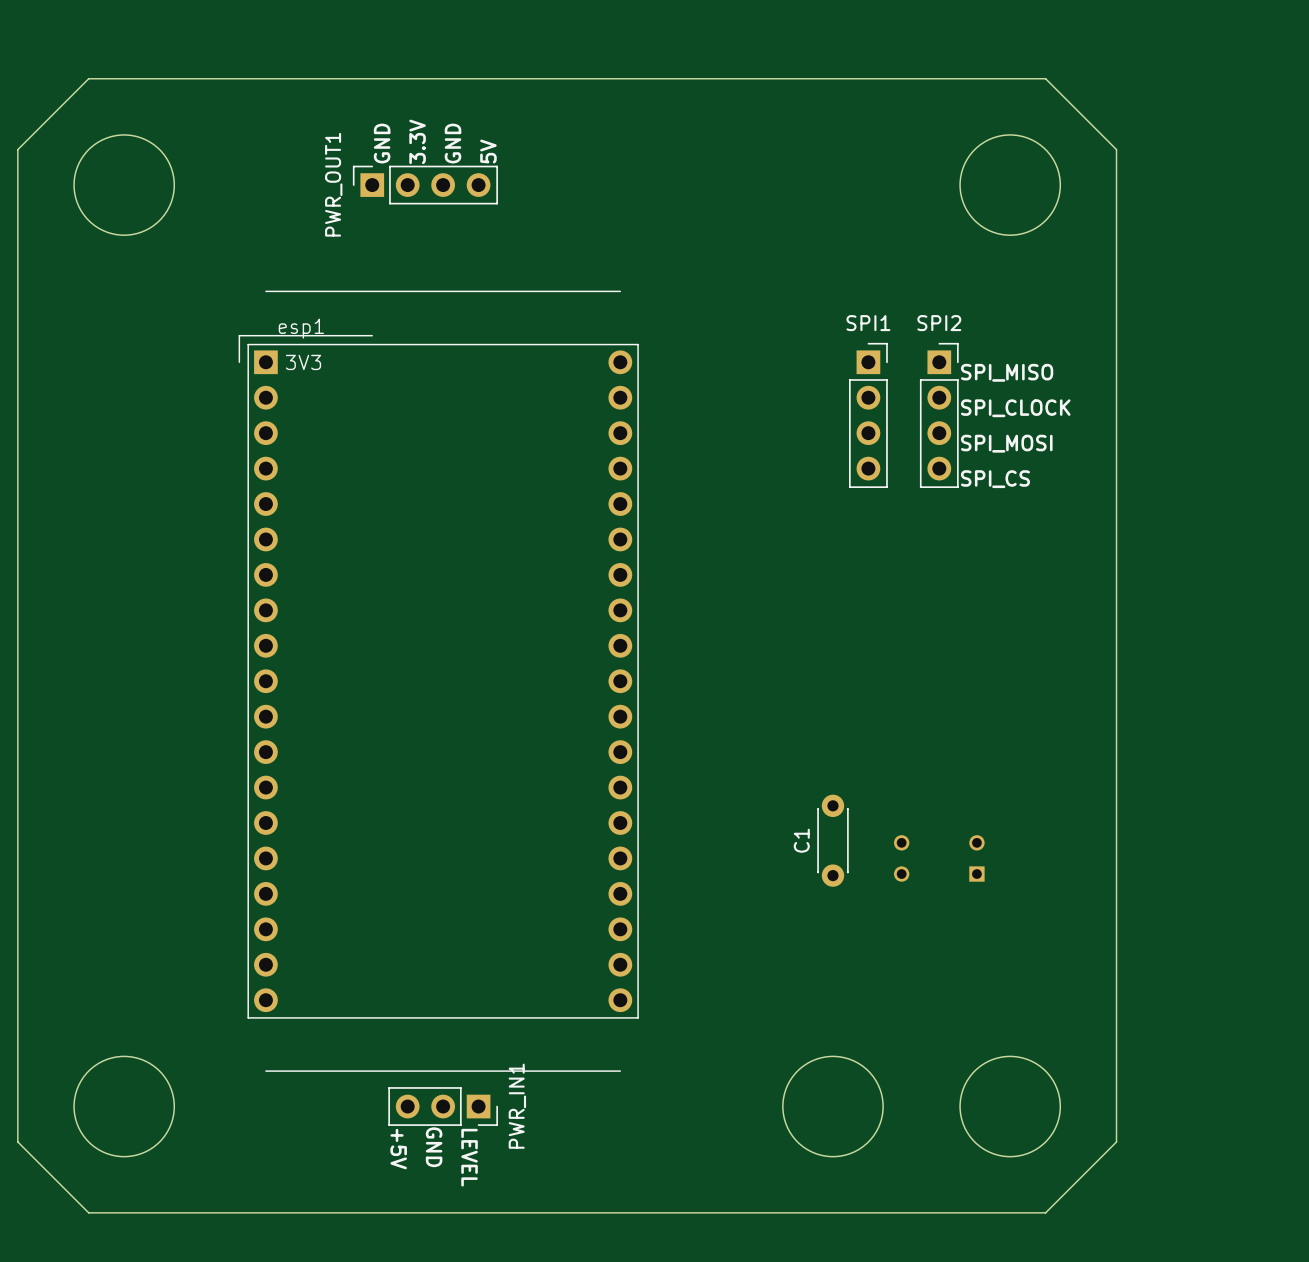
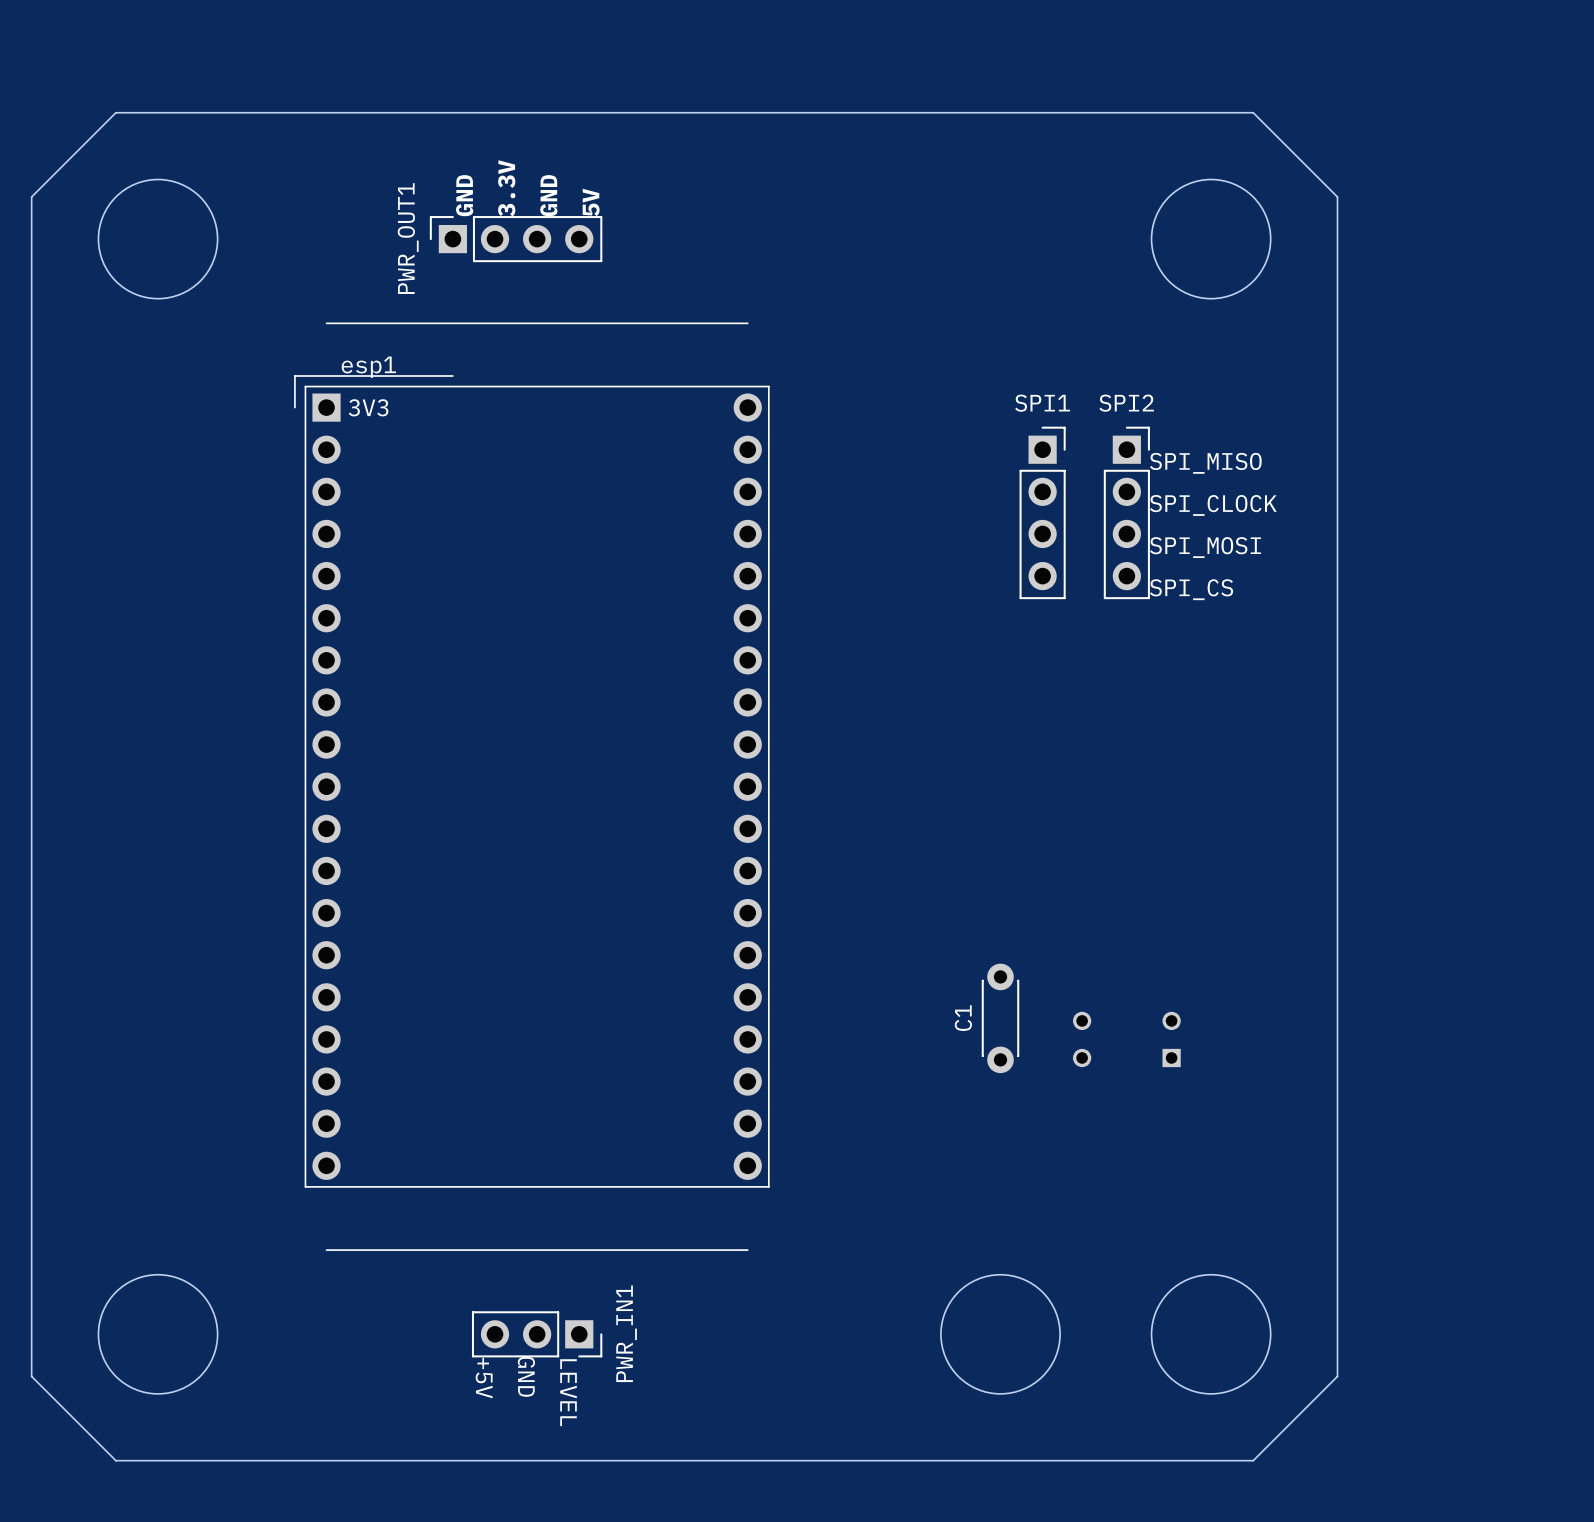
esp1 position: (438, 681) -> (531, 786)

